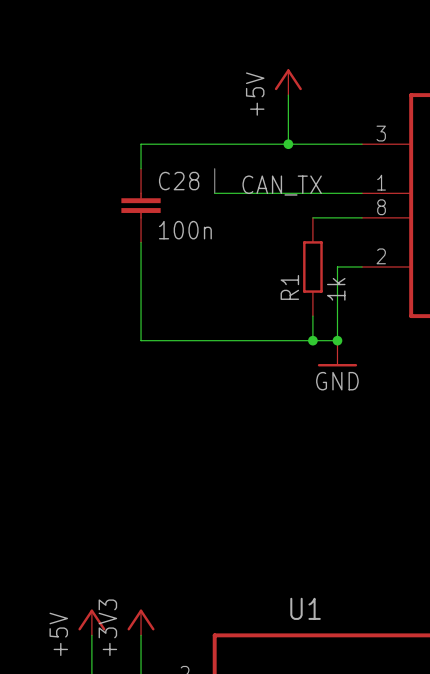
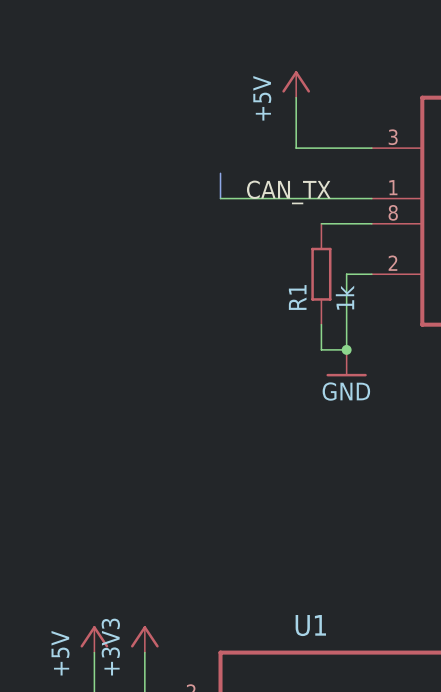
wire: (288, 144) (141, 144) (141, 168) -> none
junction: (288, 144) -> none
C28: 100n (141, 205) -> none
wire: (141, 242) (141, 340) (312, 340) -> none
junction: (312, 340) -> none

